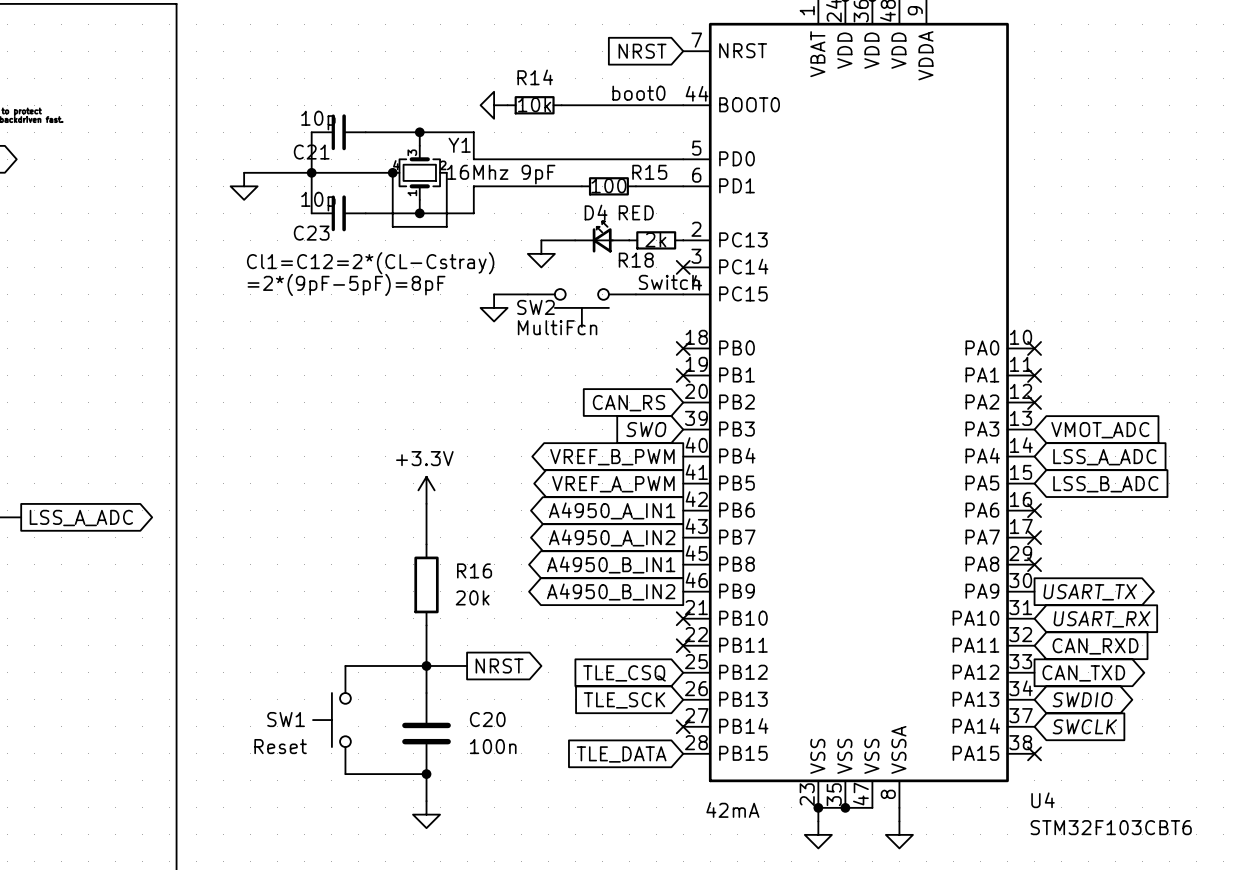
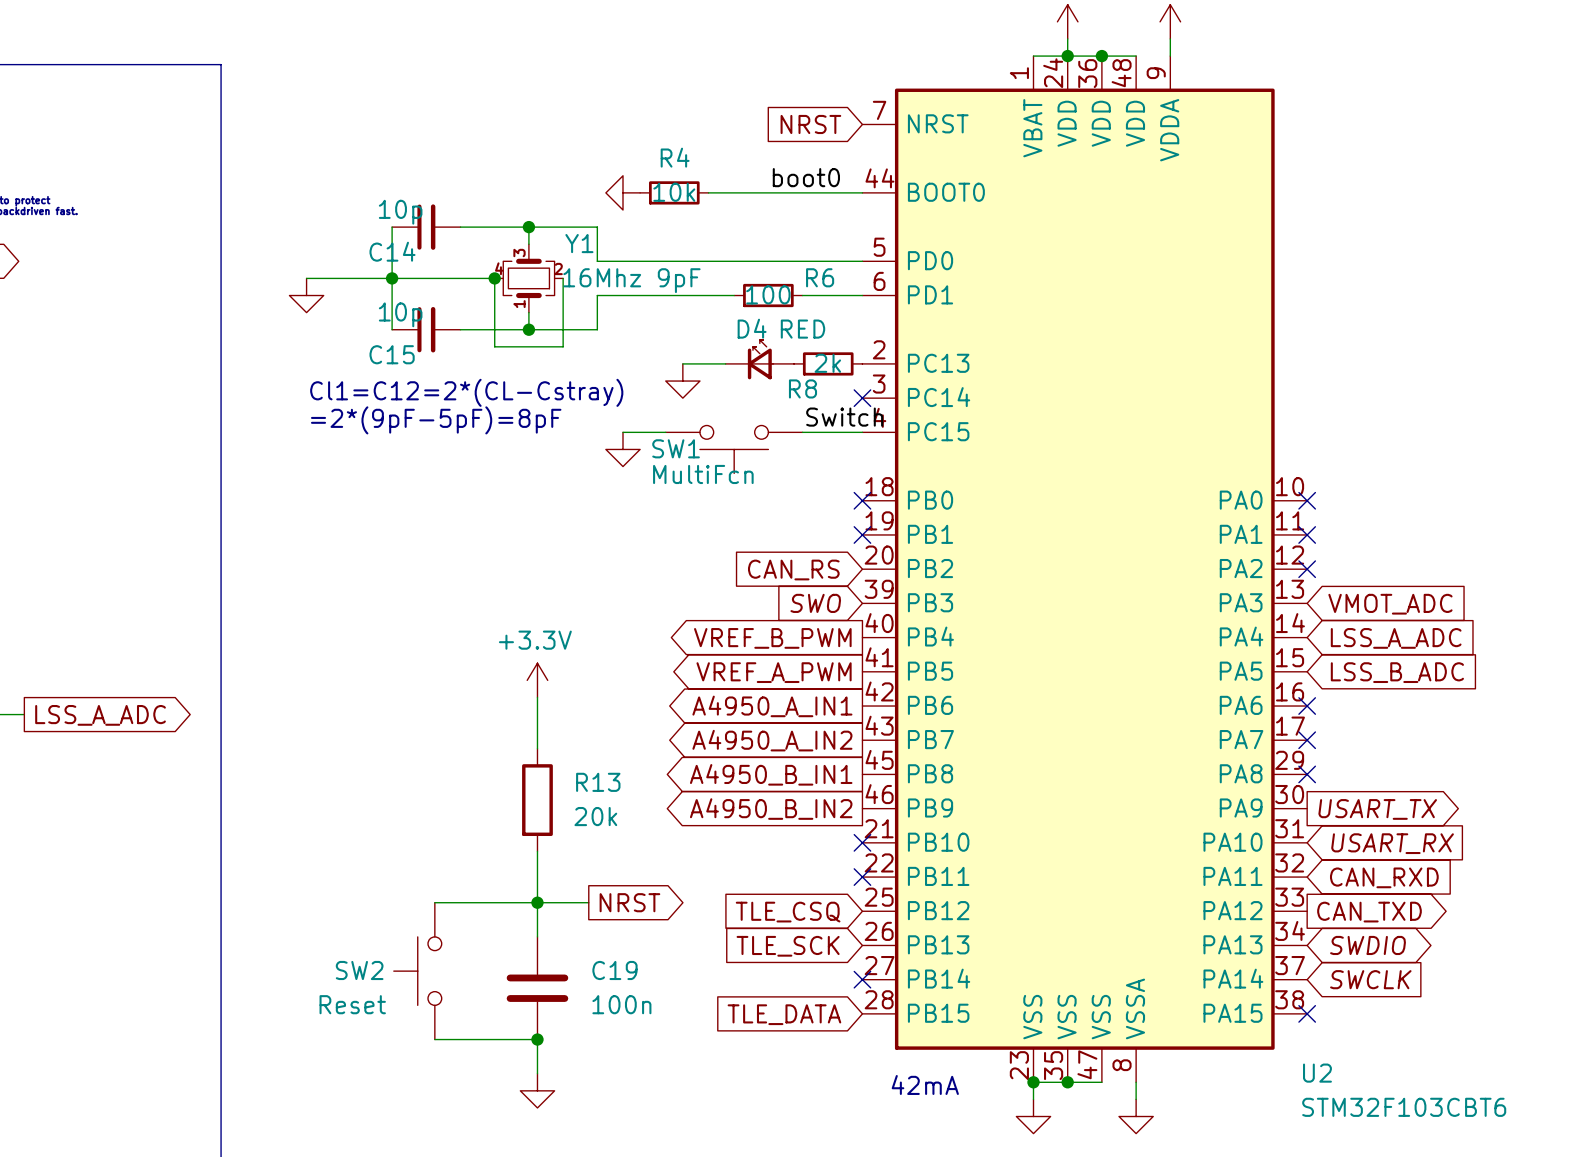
R14 name: R14 (535, 77) -> R4 (675, 157)
C21 name: C21 (311, 152) -> C14 (392, 251)
R15 name: R15 (649, 172) -> R6 (820, 277)
C23 name: C23 (311, 233) -> C15 (392, 354)
R18 name: R18 (636, 260) -> R8 (802, 388)
SW2 name: SW2 (536, 307) -> SW1 (676, 448)
R16 name: R16 (474, 570) -> R13 (598, 782)
SW1 name: SW1 (286, 719) -> SW2 (359, 970)
C20 name: C20 (487, 719) -> C19 (614, 970)
U4 name: U4 (1043, 800) -> U2 (1317, 1073)

